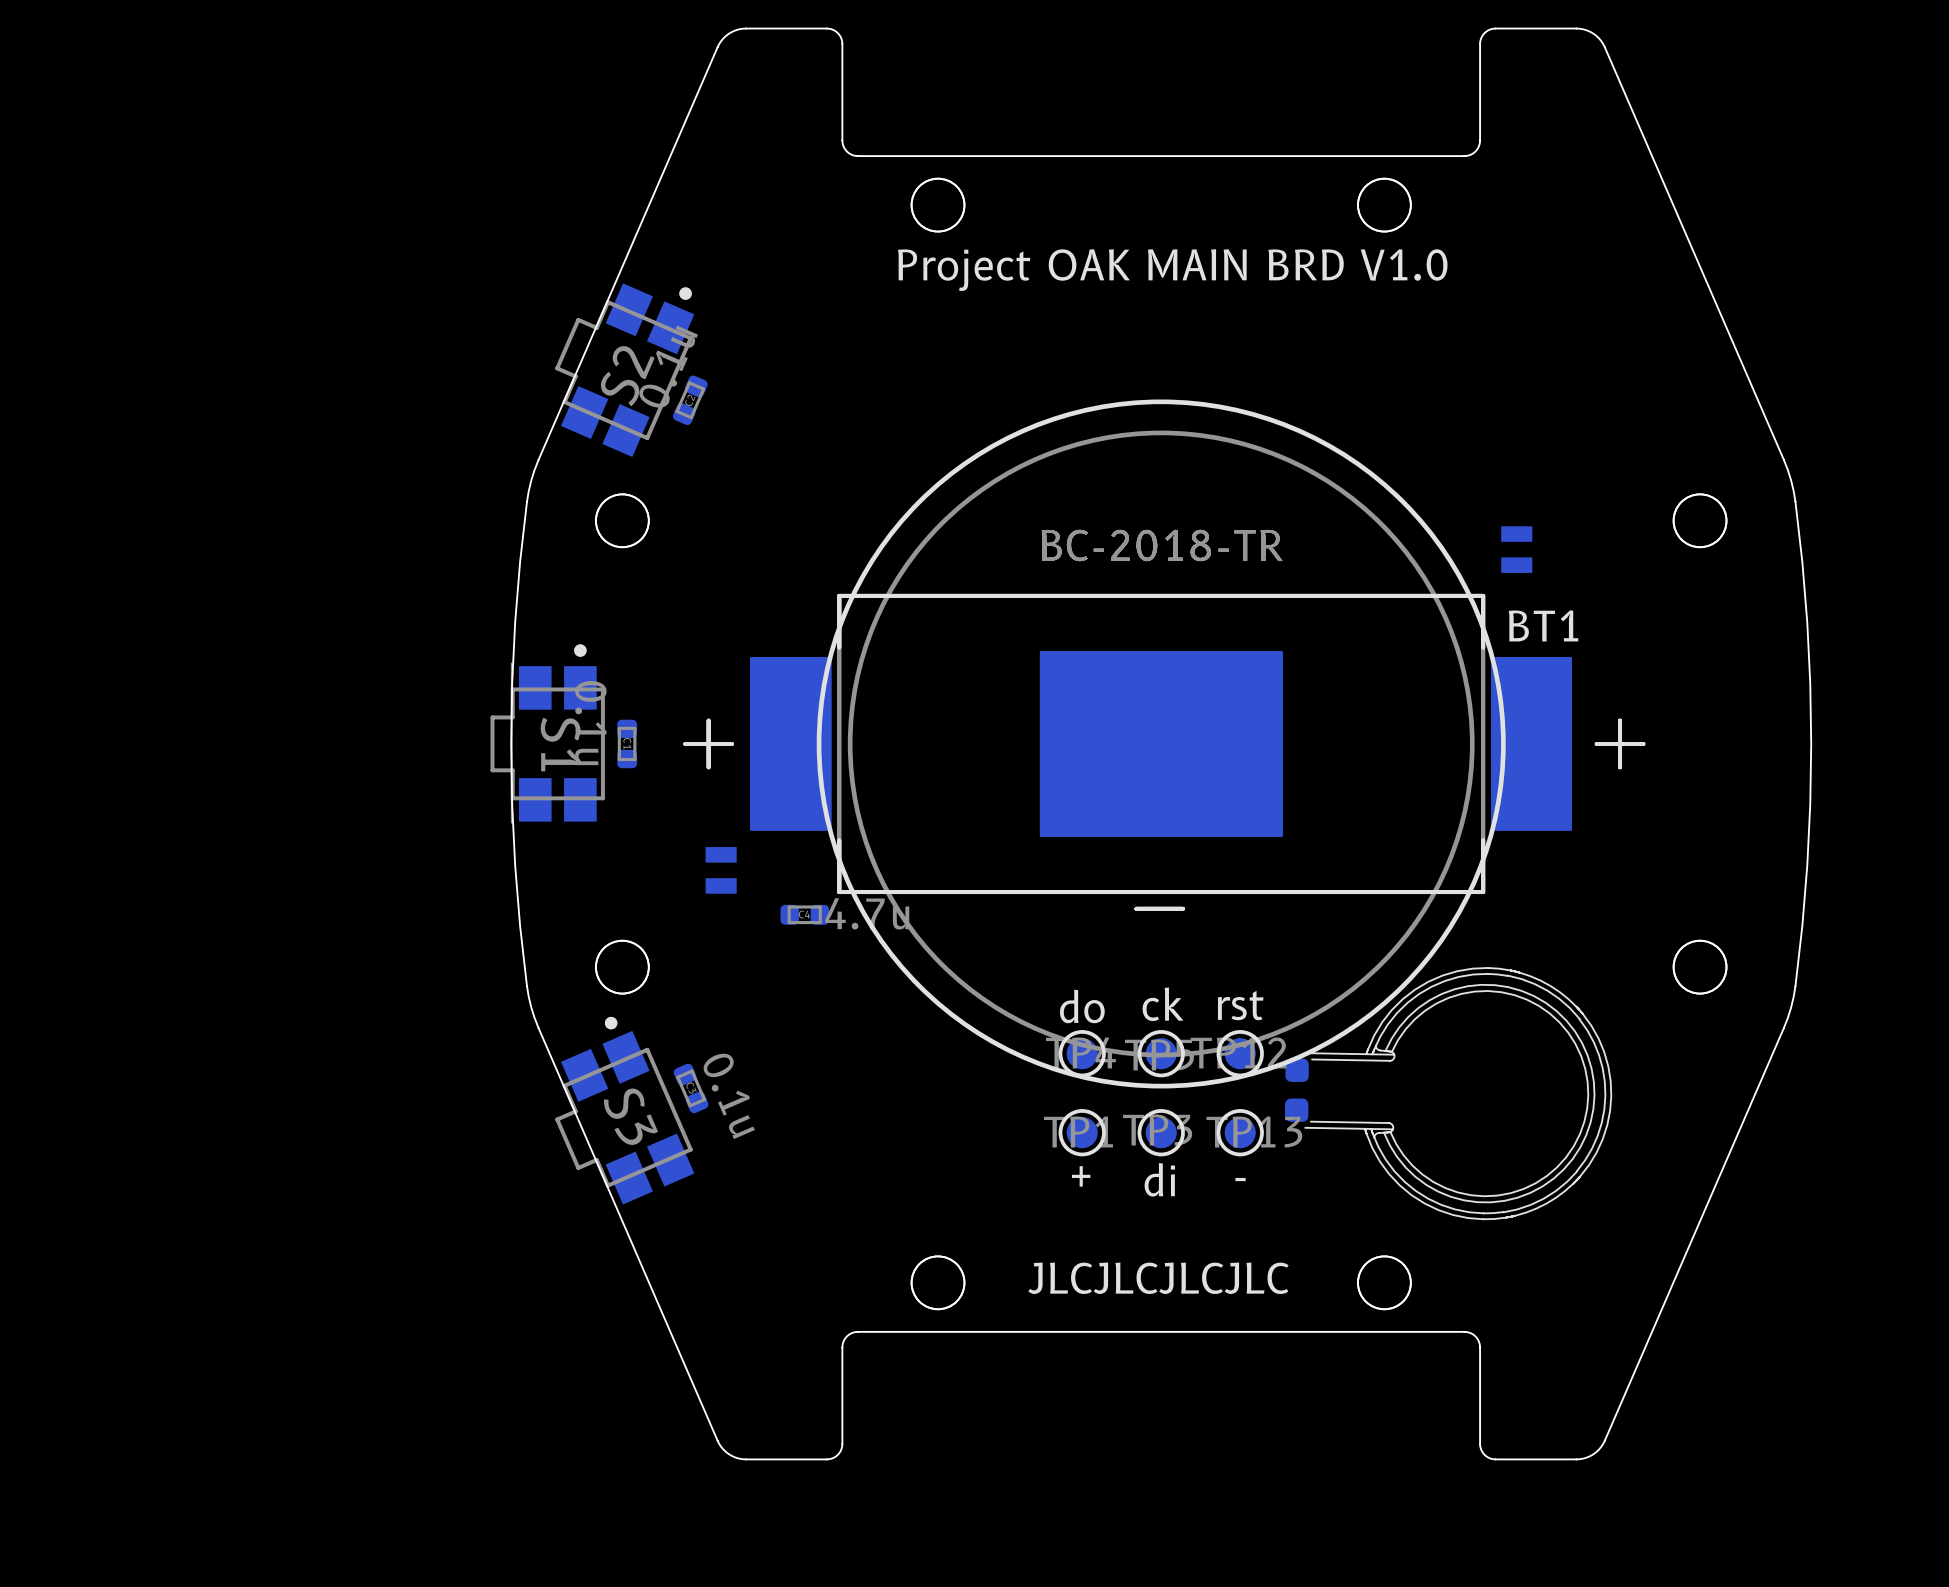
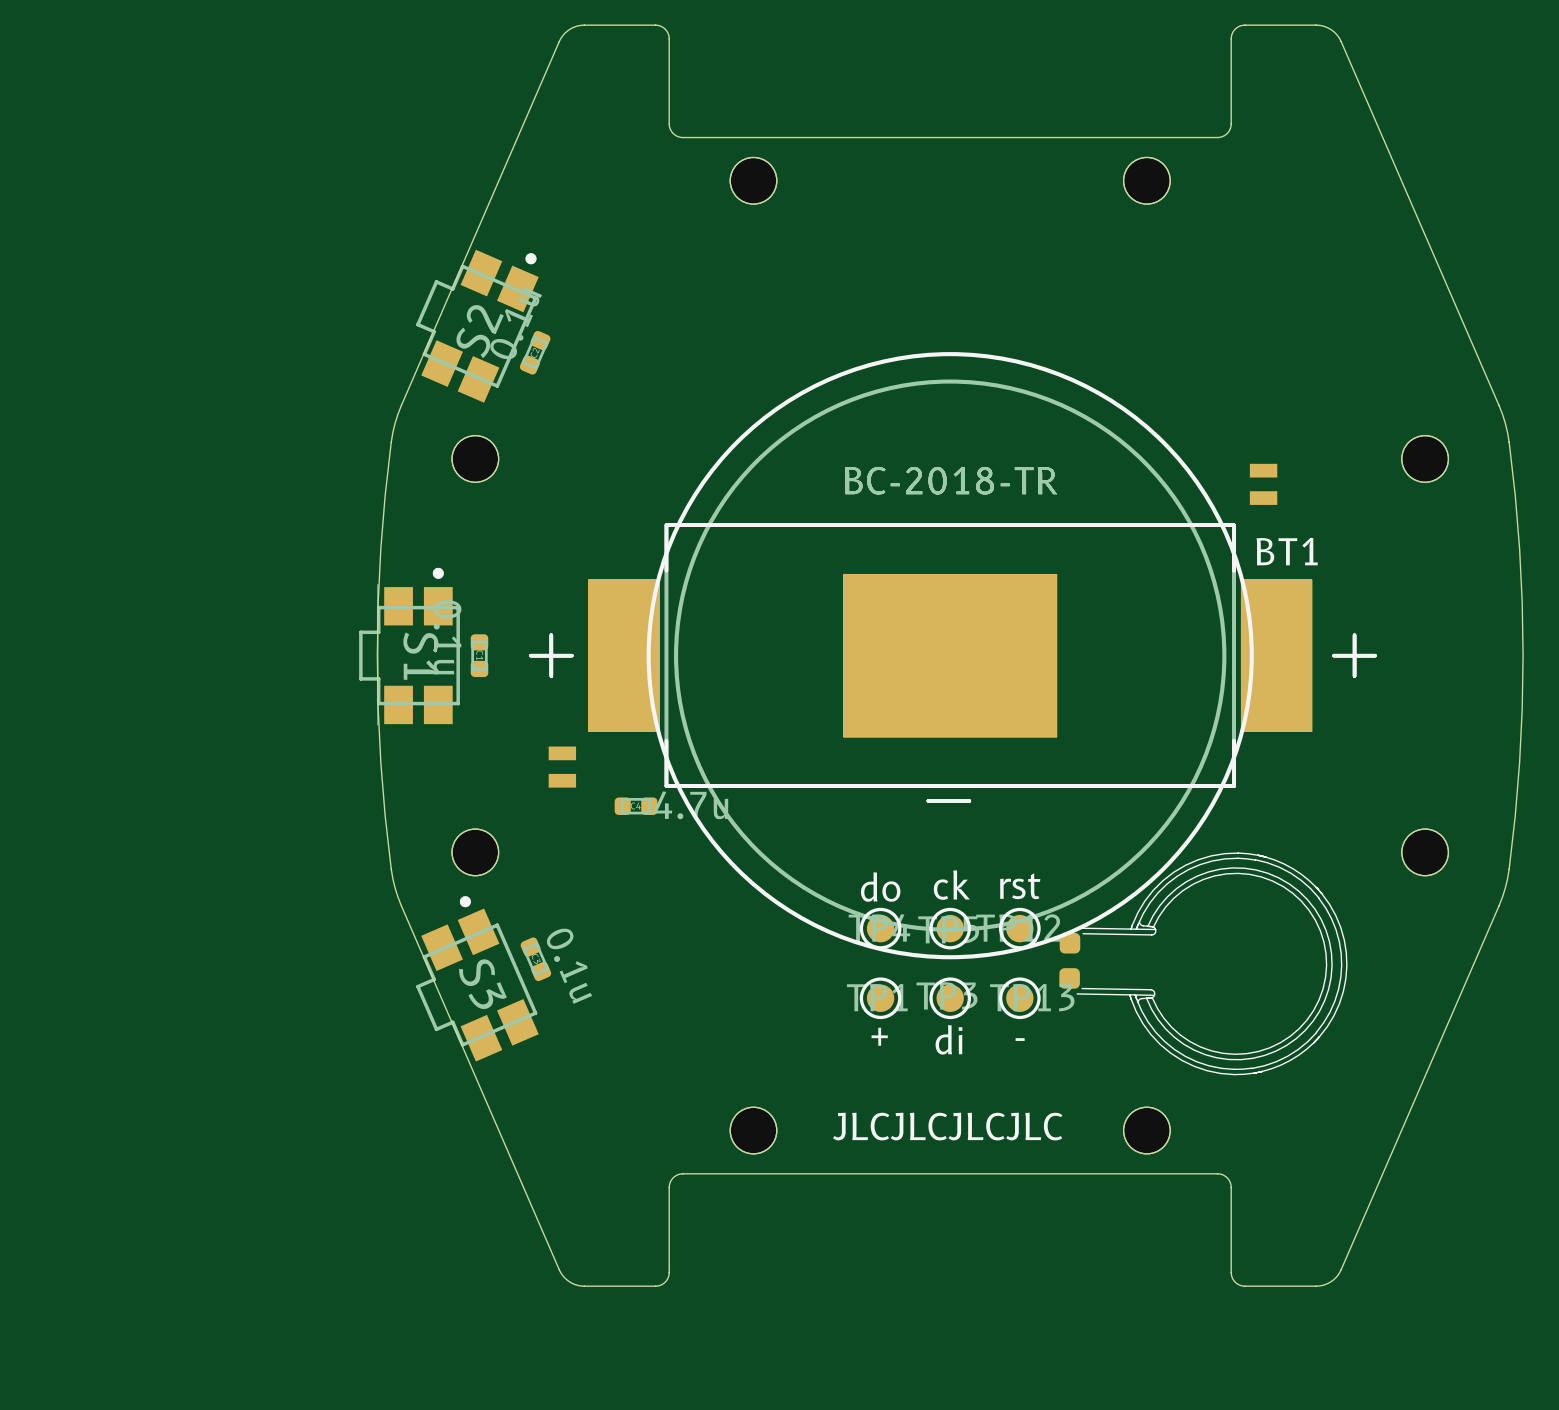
text: Project OAK MAIN BRD V1.0 (1172, 270) -> none

